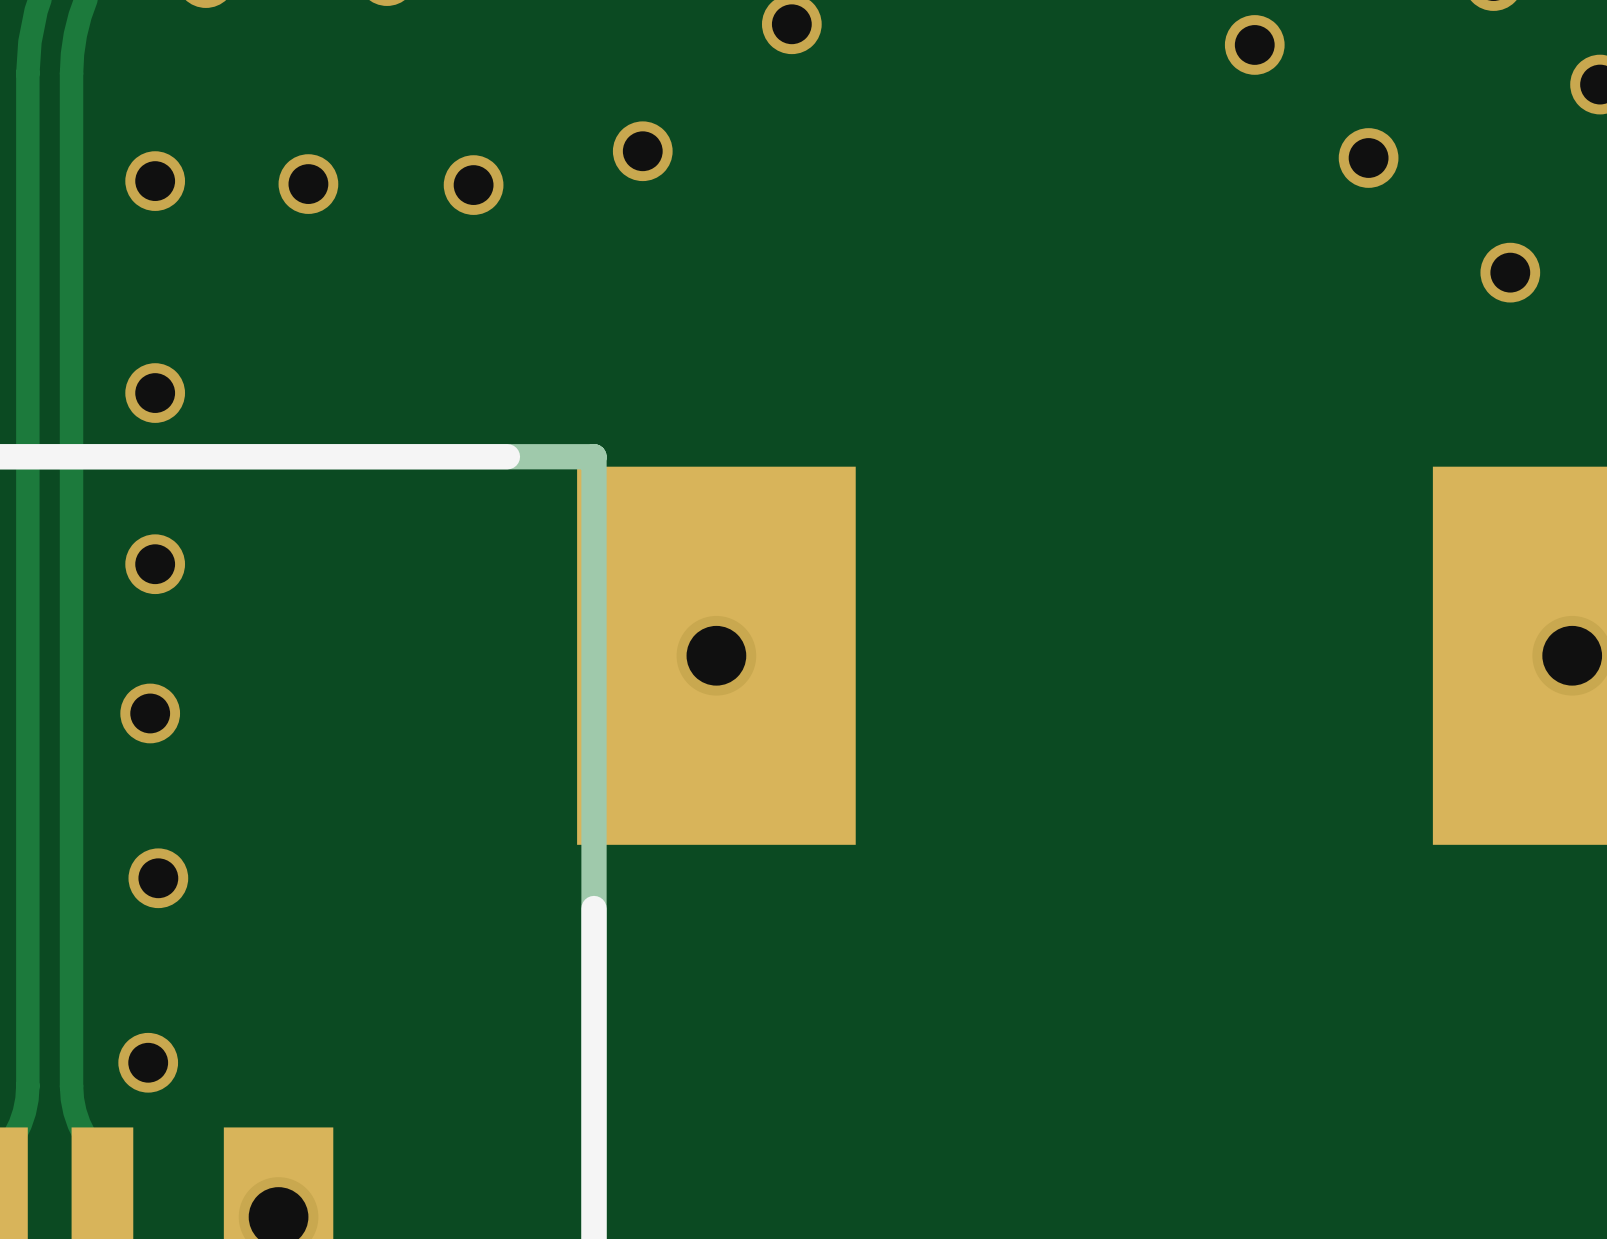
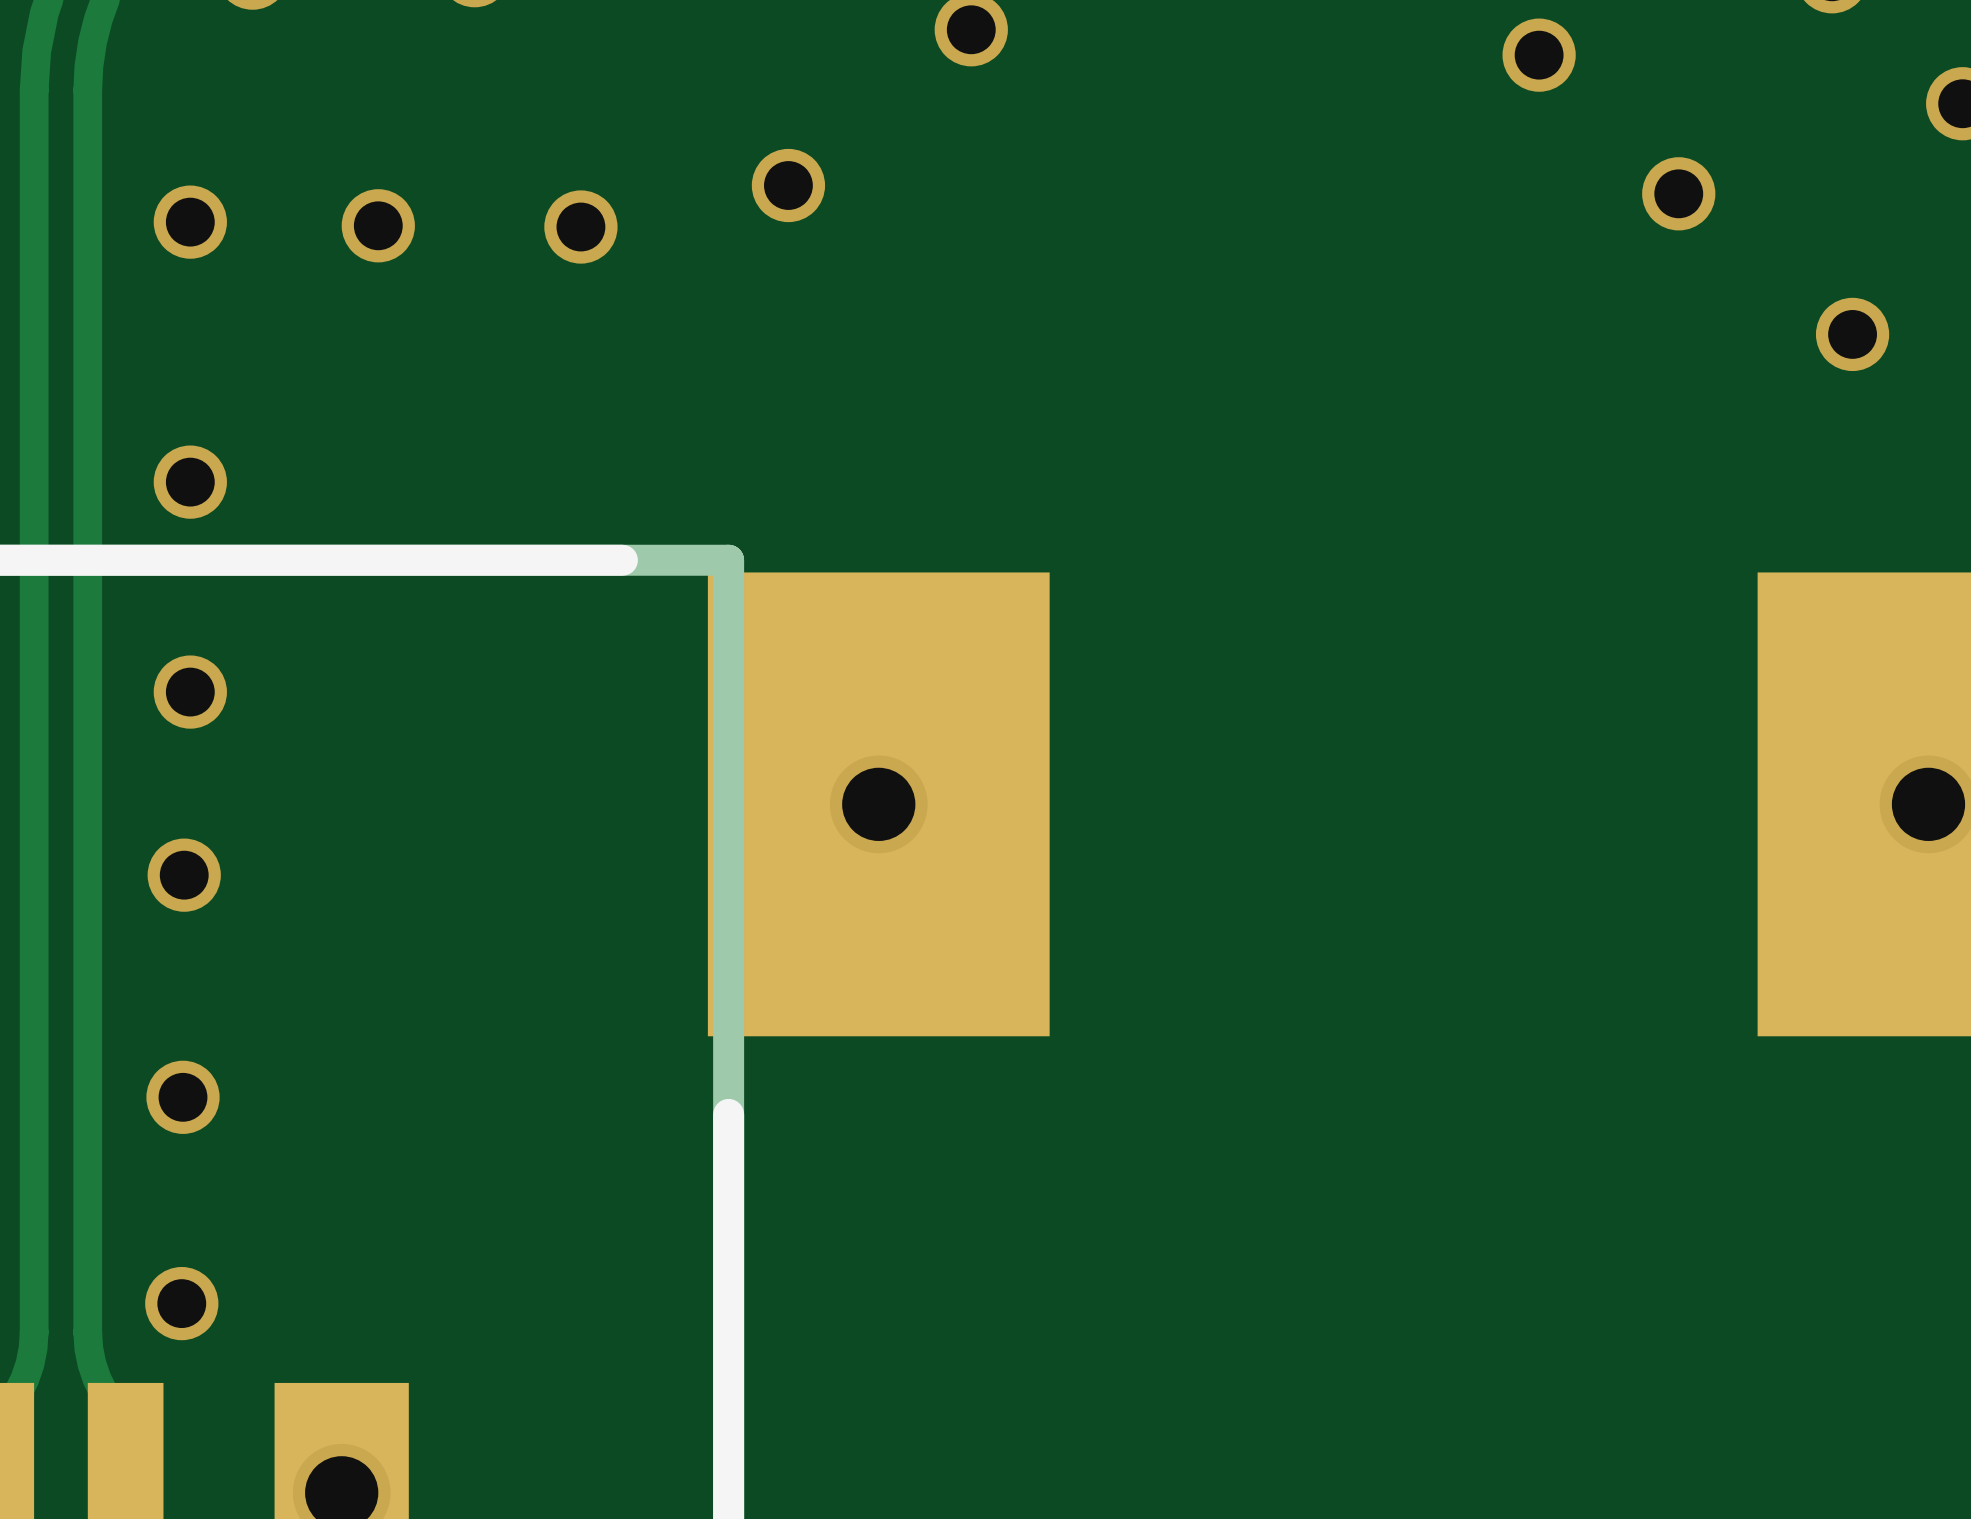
via position: (158, 878) -> (183, 1097)

